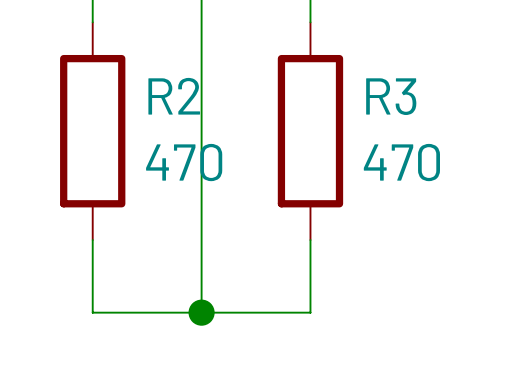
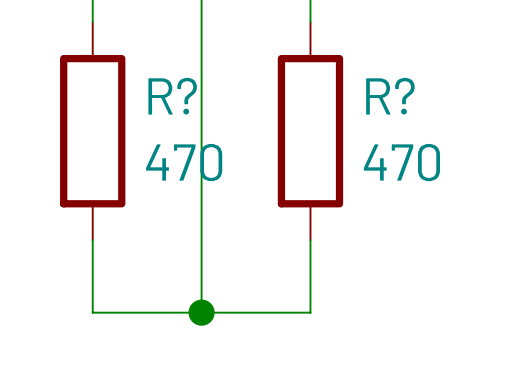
R2 name: R2 (174, 96) -> R? (172, 96)
R3 name: R3 (391, 96) -> R? (390, 96)

